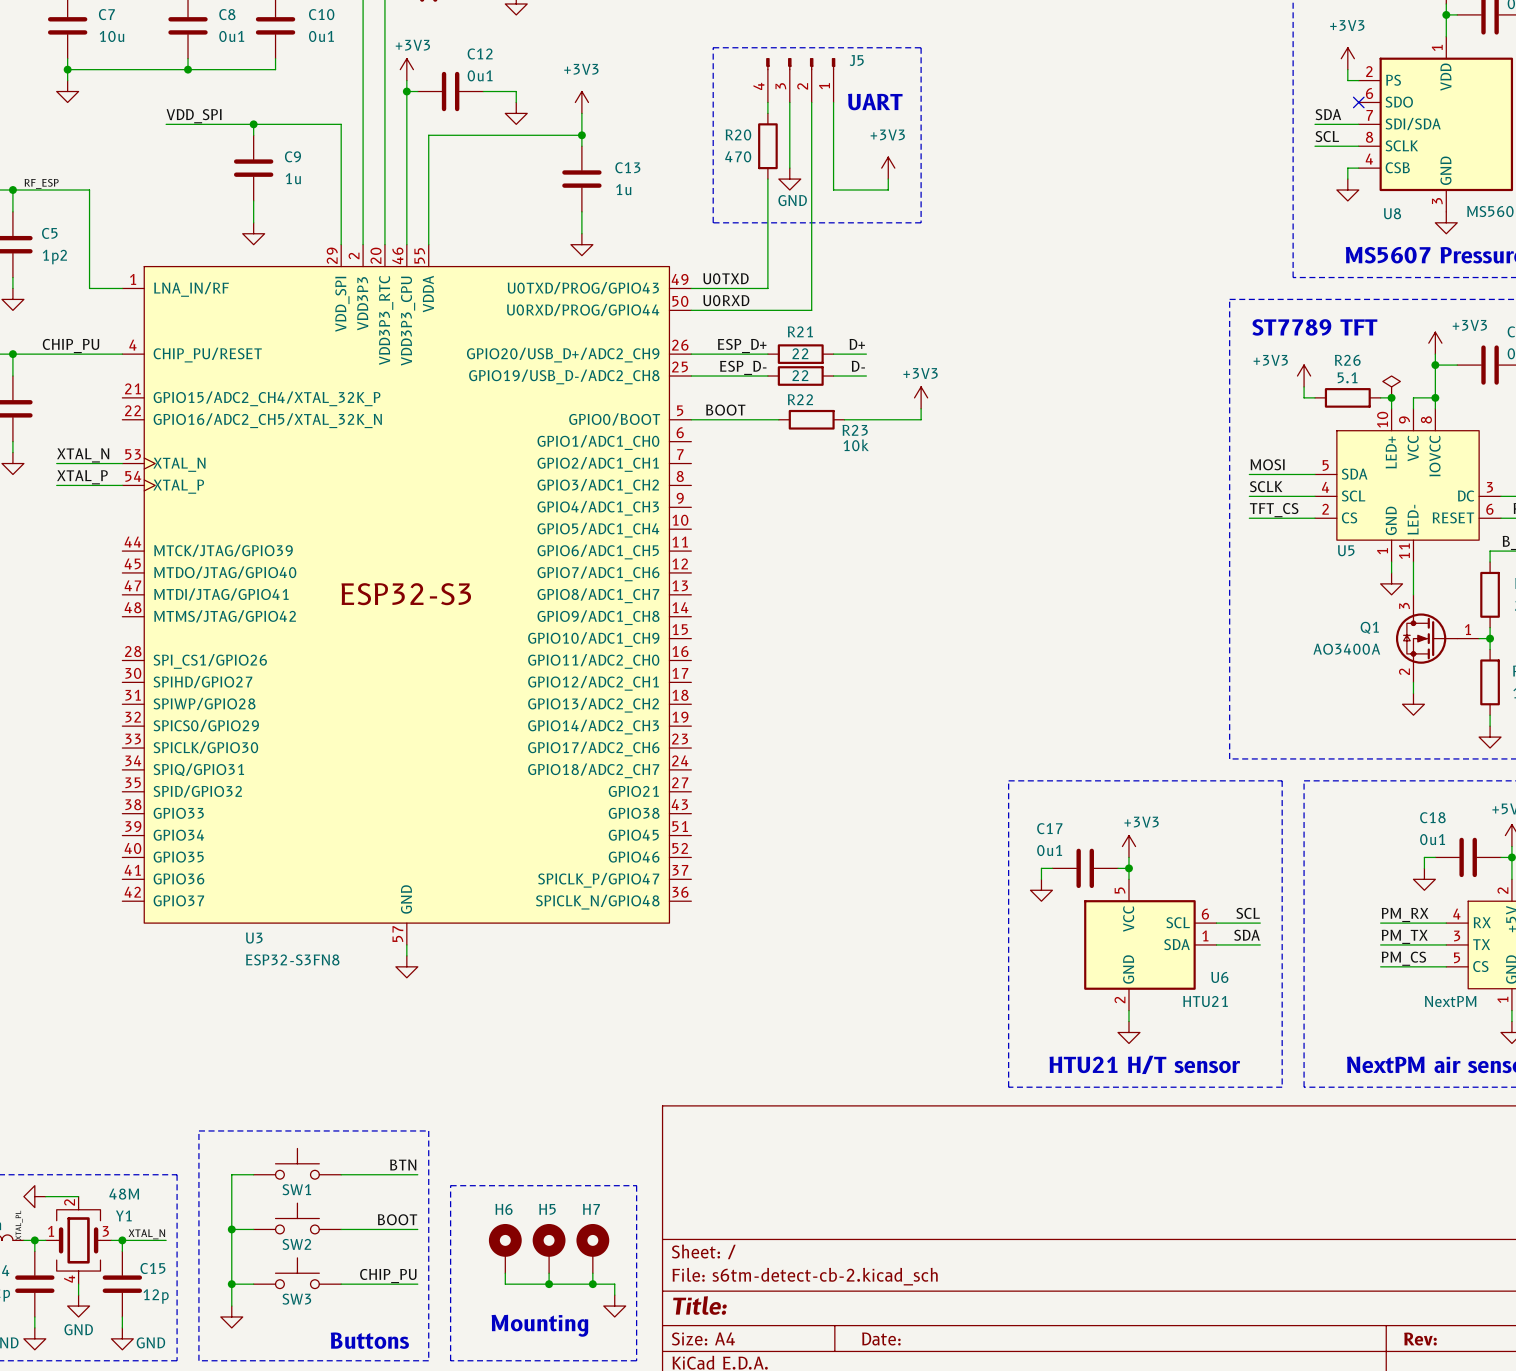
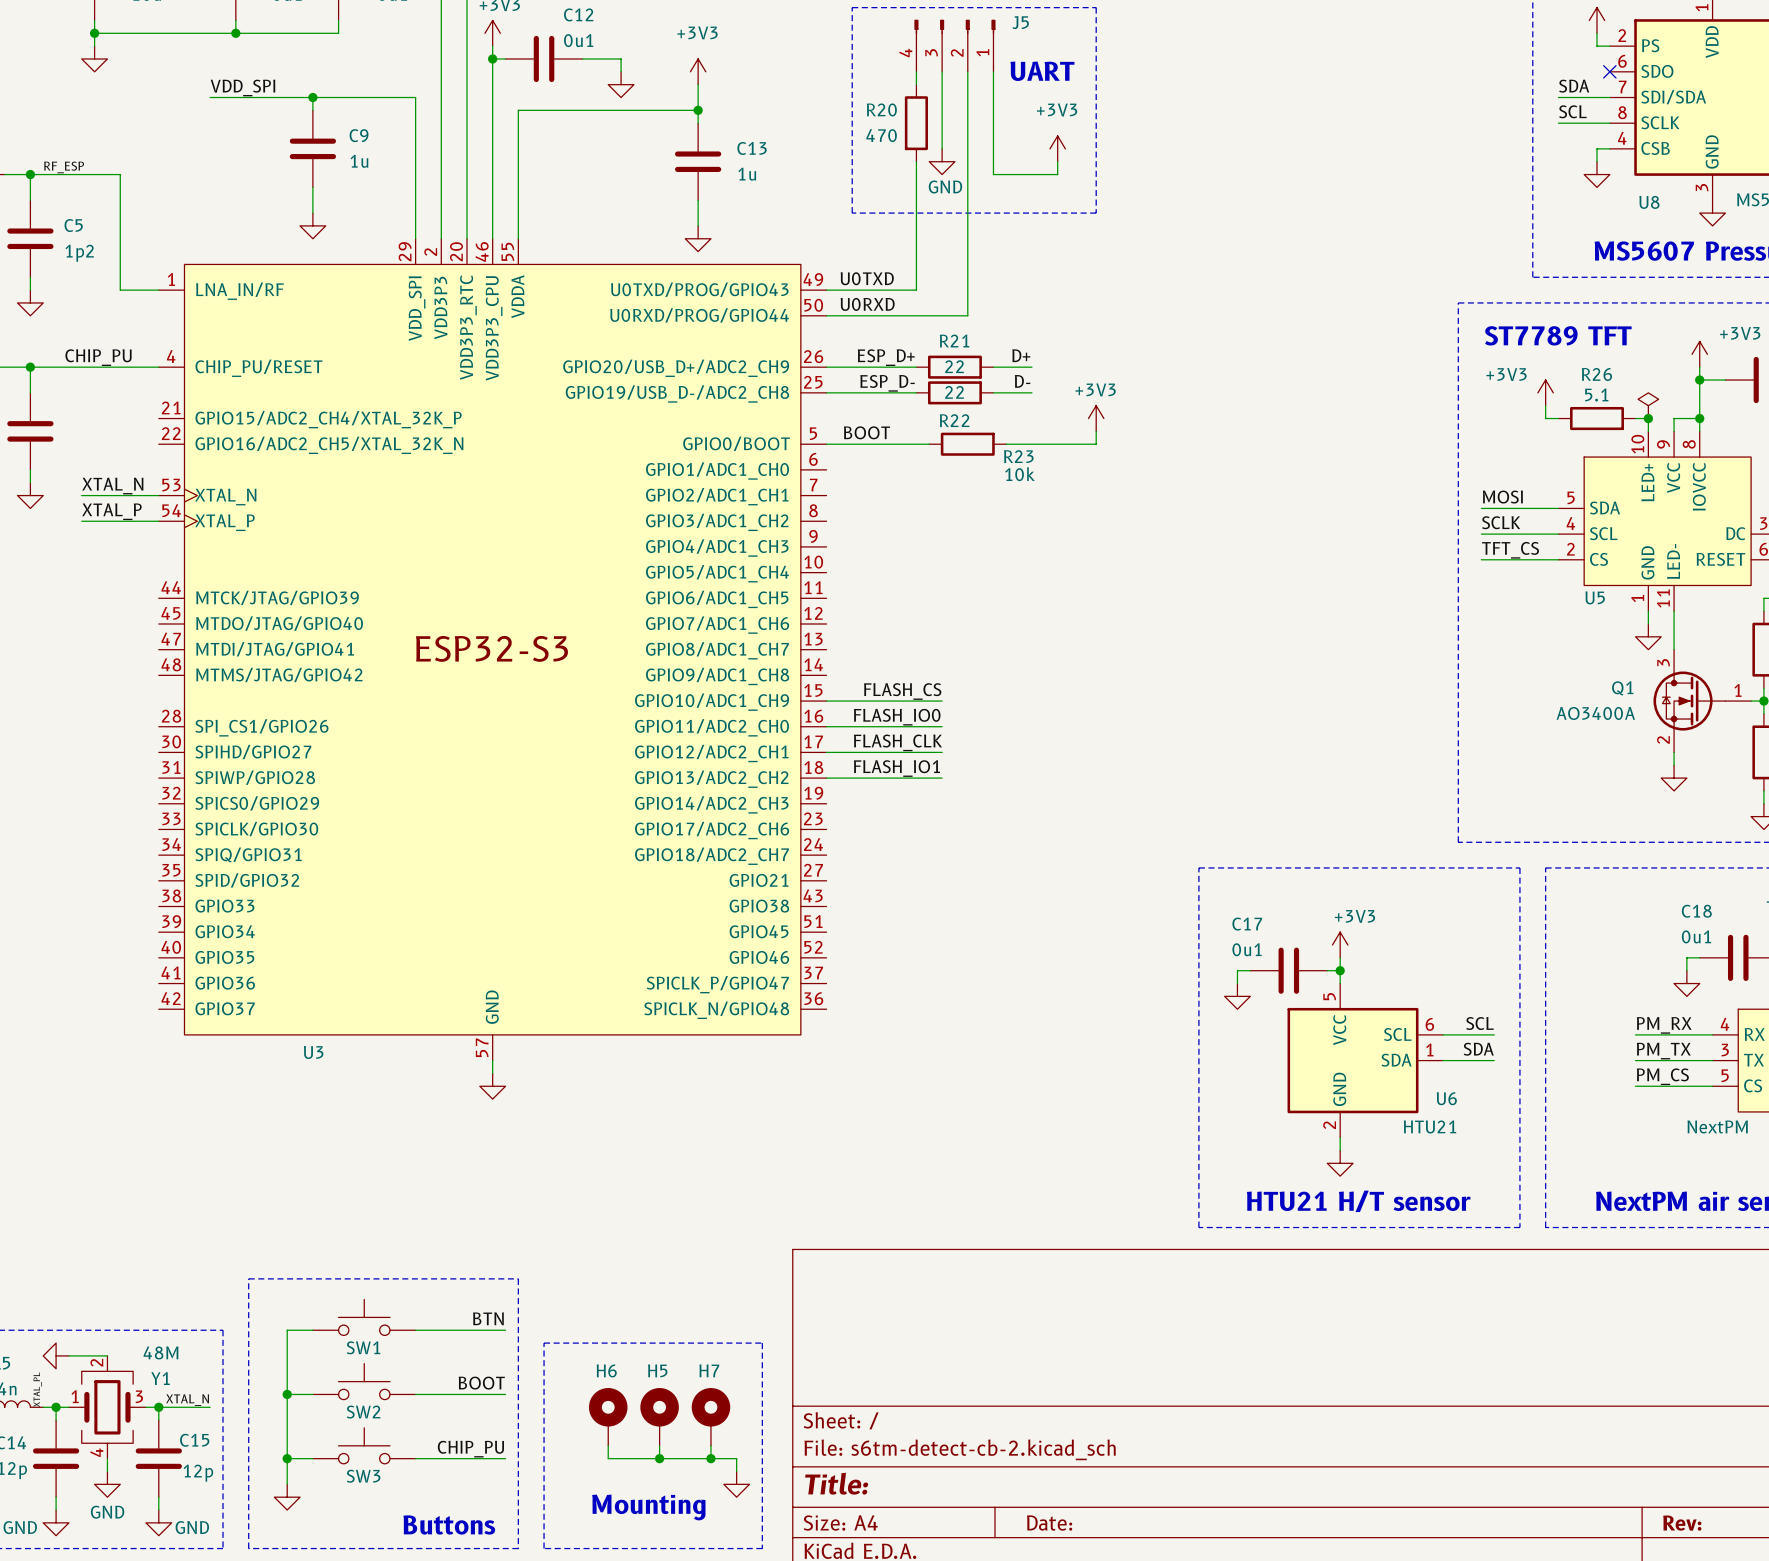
label: none -> FLASH_CS (902, 691)
wire: none -> (826, 701) (942, 701)
label: none -> FLASH_IO0 (897, 717)
wire: none -> (826, 726) (942, 726)
label: none -> FLASH_CLK (897, 742)
wire: none -> (826, 752) (942, 752)
label: none -> FLASH_IO1 (896, 768)
wire: none -> (826, 778) (942, 778)
U3 value: ESP32-S3FN8 (292, 959) -> none

